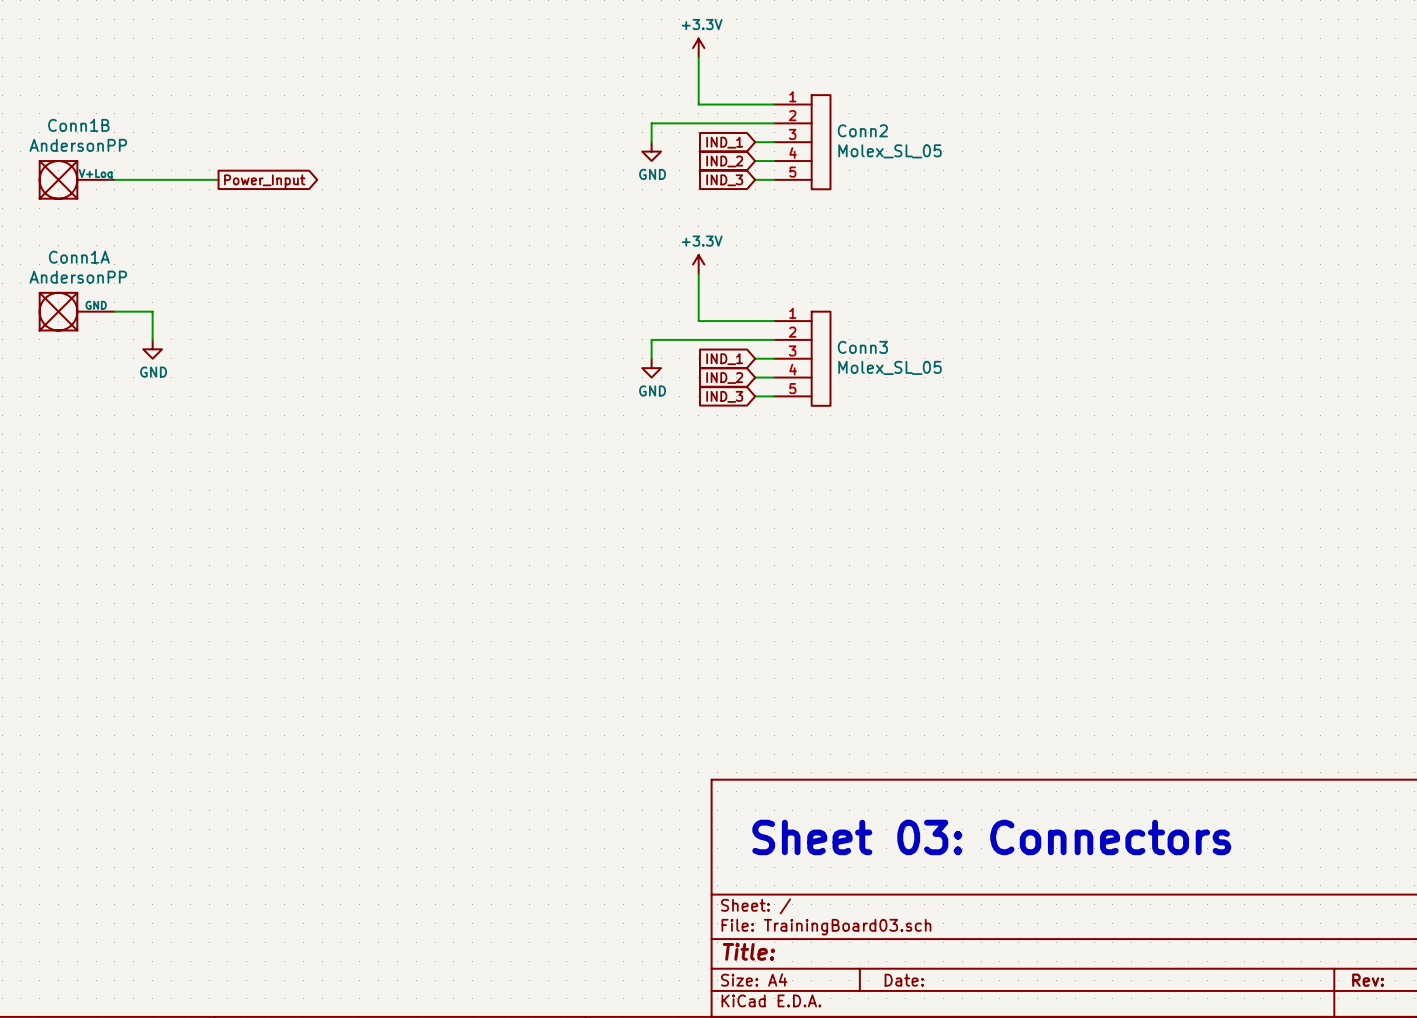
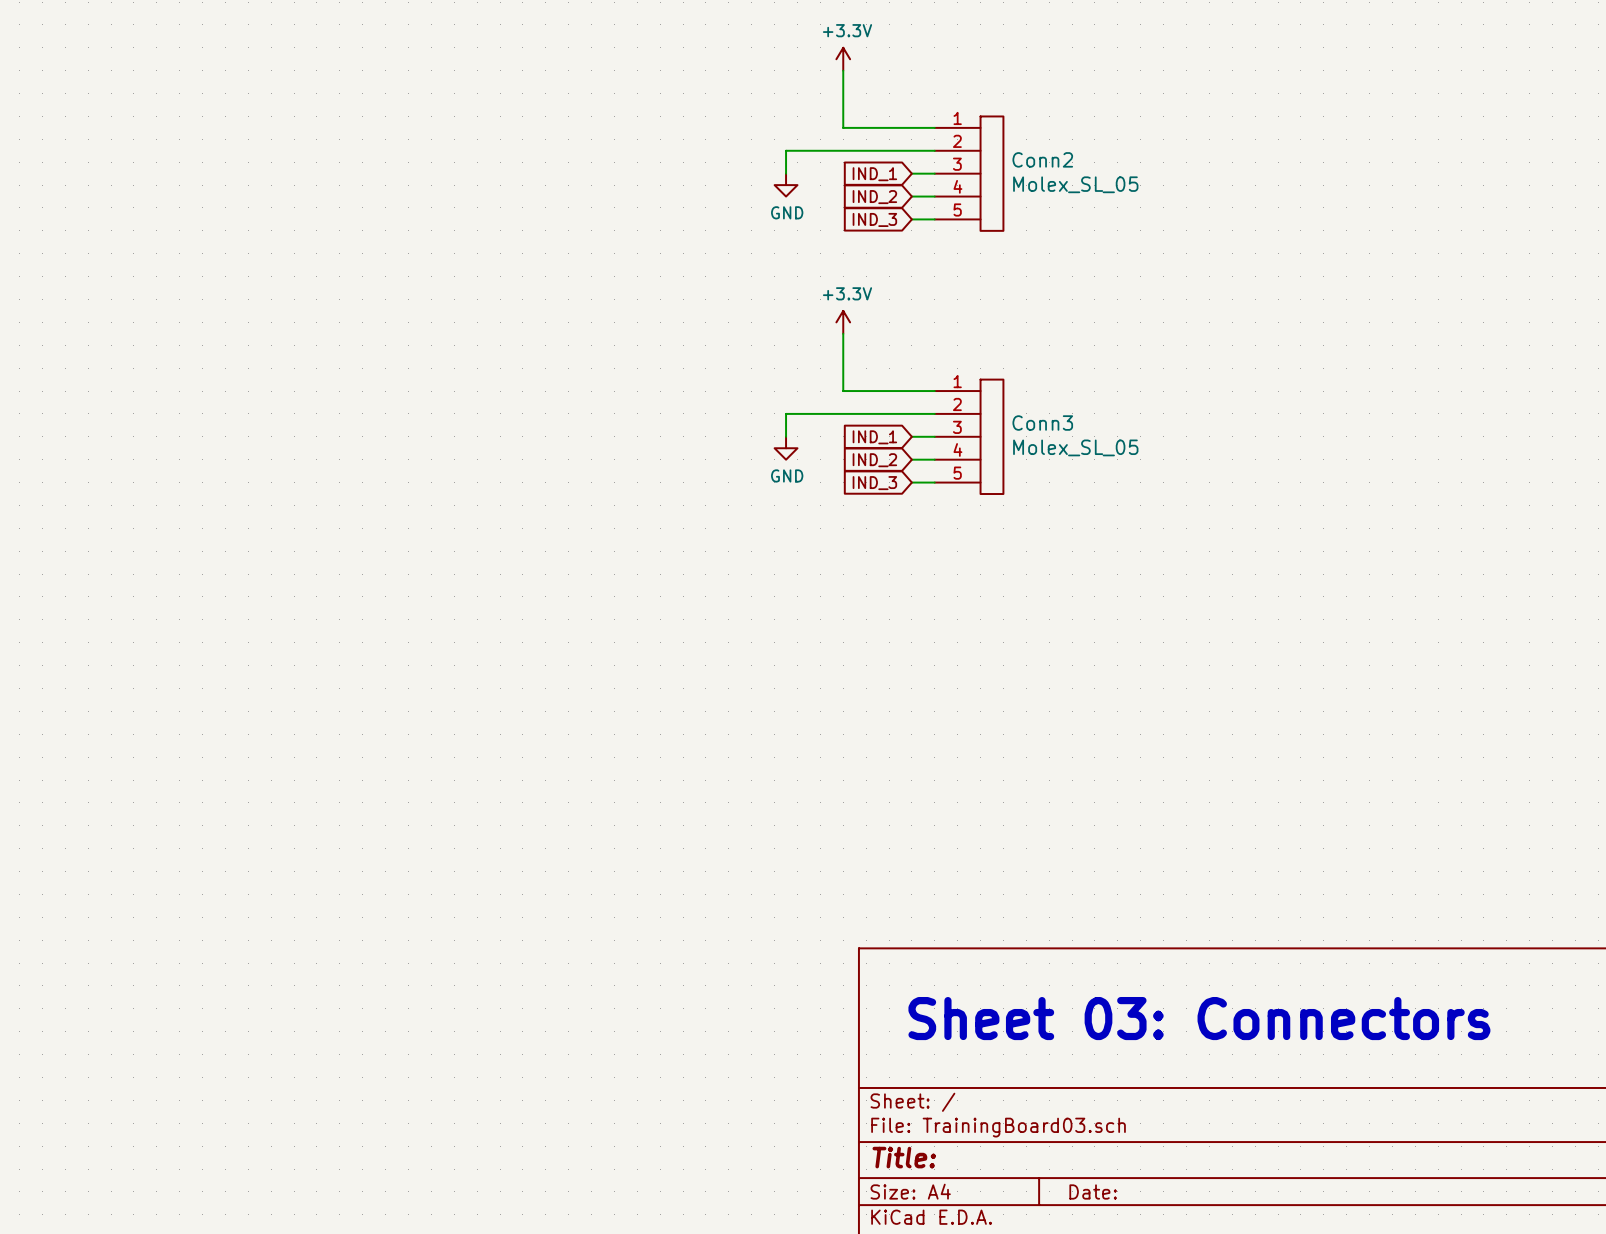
Conn1B: AndersonPP (77, 179) -> none
wire: (114, 179) (218, 179) -> none
global label: Power_Input (264, 181) -> none
Conn1A: AndersonPP (77, 311) -> none
wire: (114, 311) (152, 311) (152, 339) -> none
power symbol: GND (152, 349) -> none

